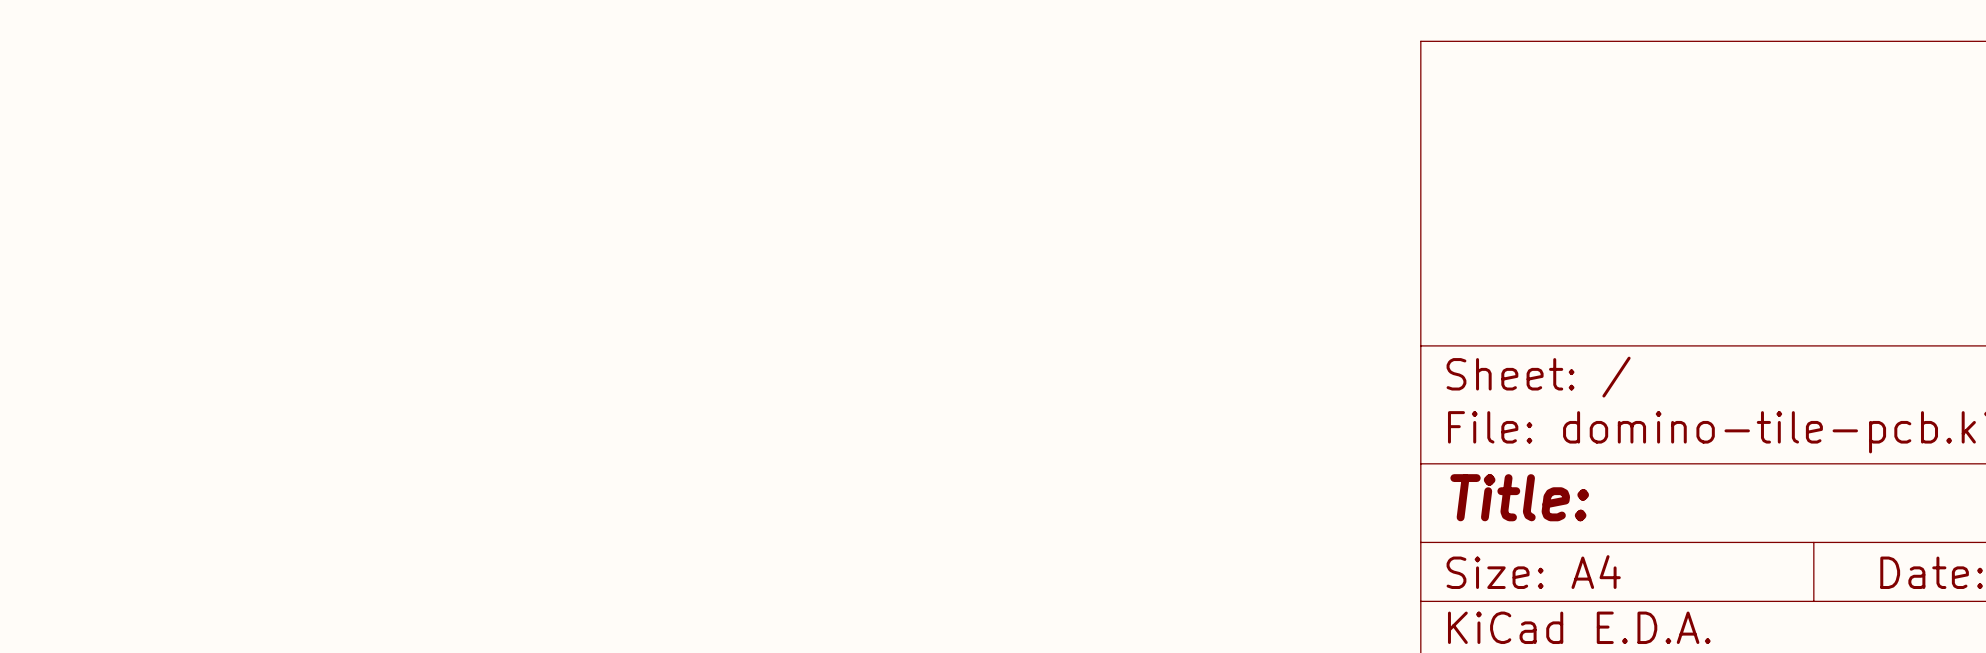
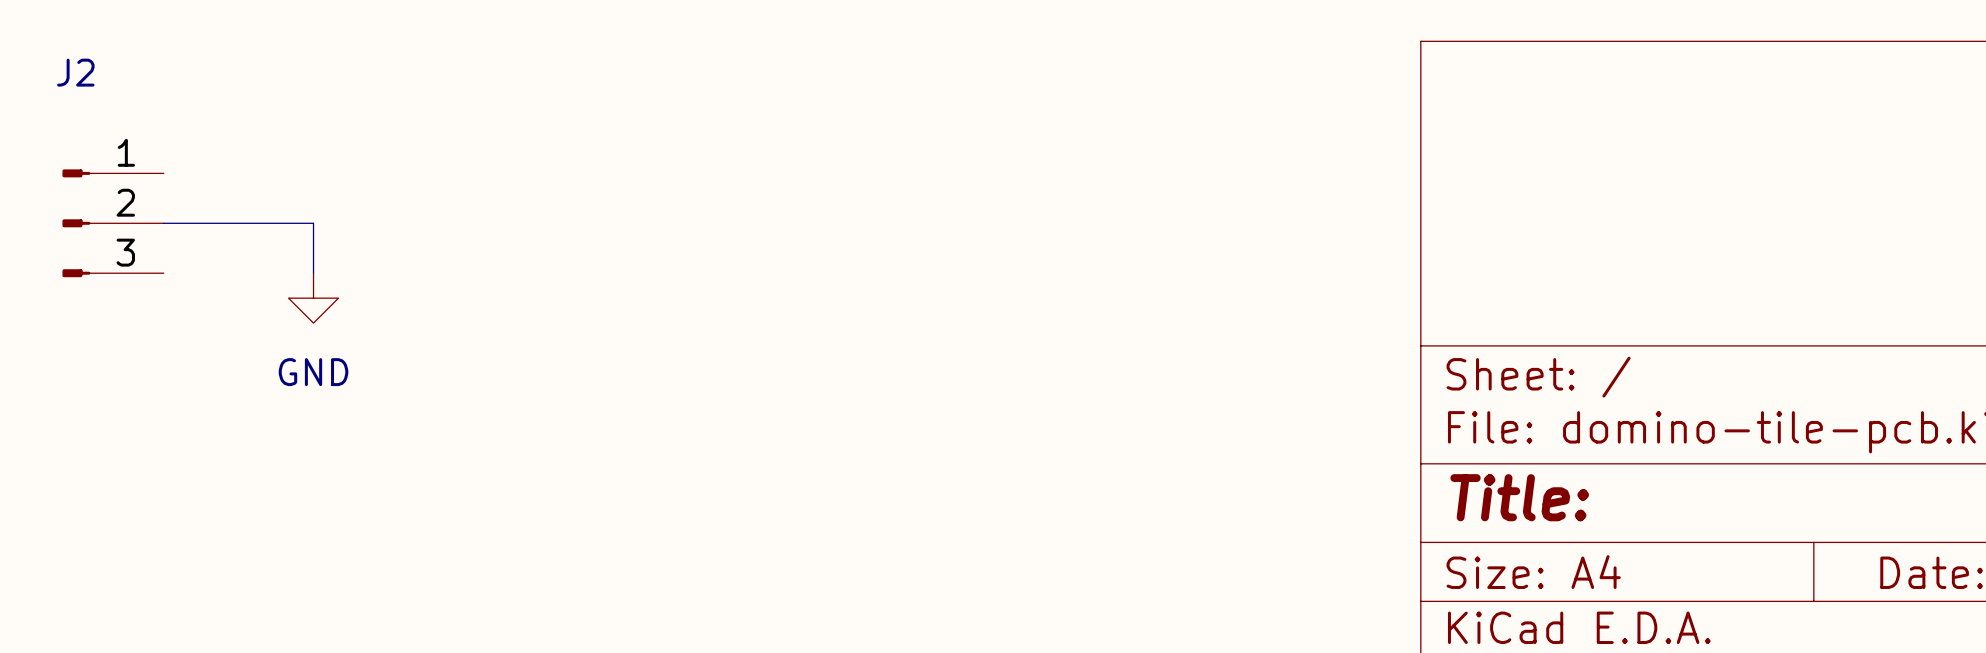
J2: none -> (113, 223)
wire: none -> (163, 223) (313, 223) (313, 273)
power symbol: none -> GND (313, 298)

